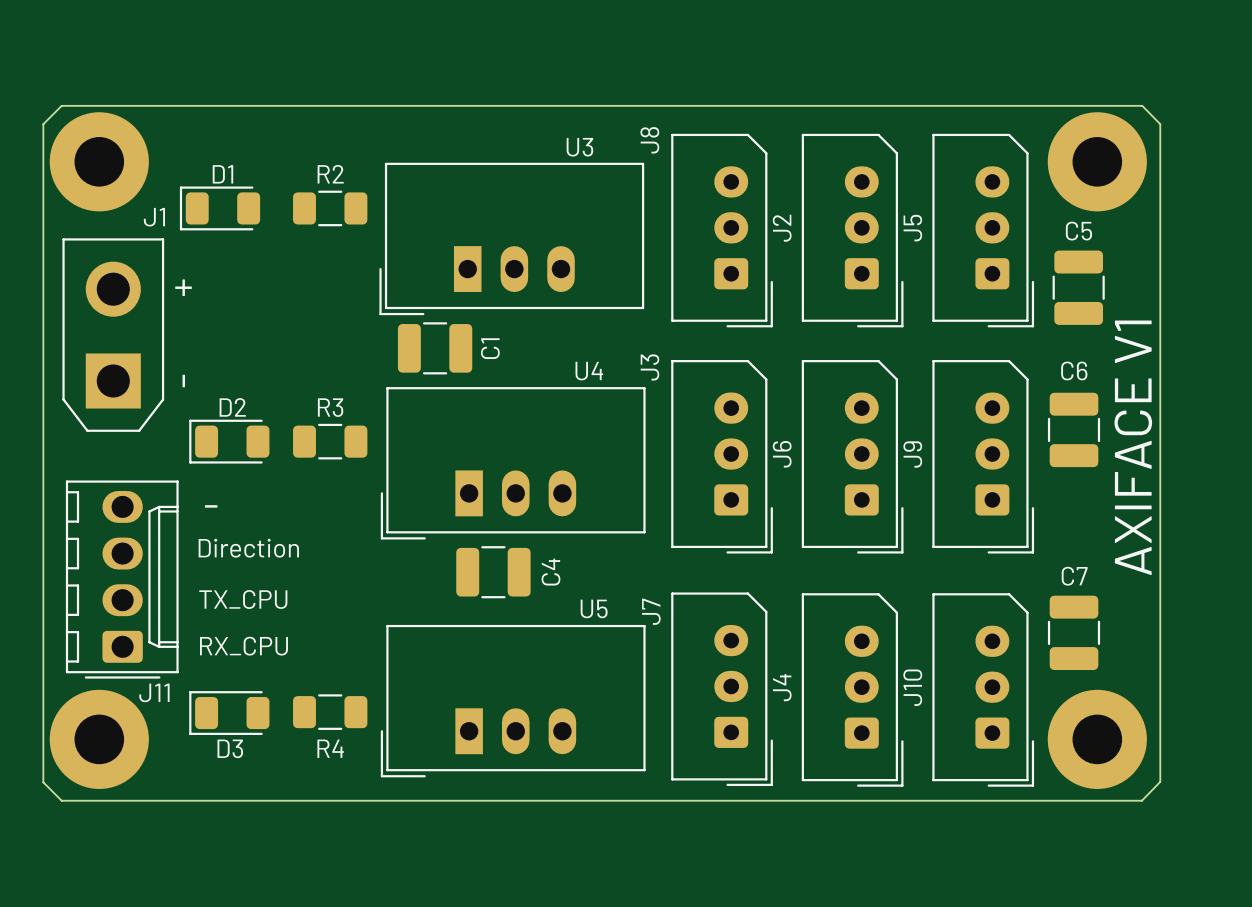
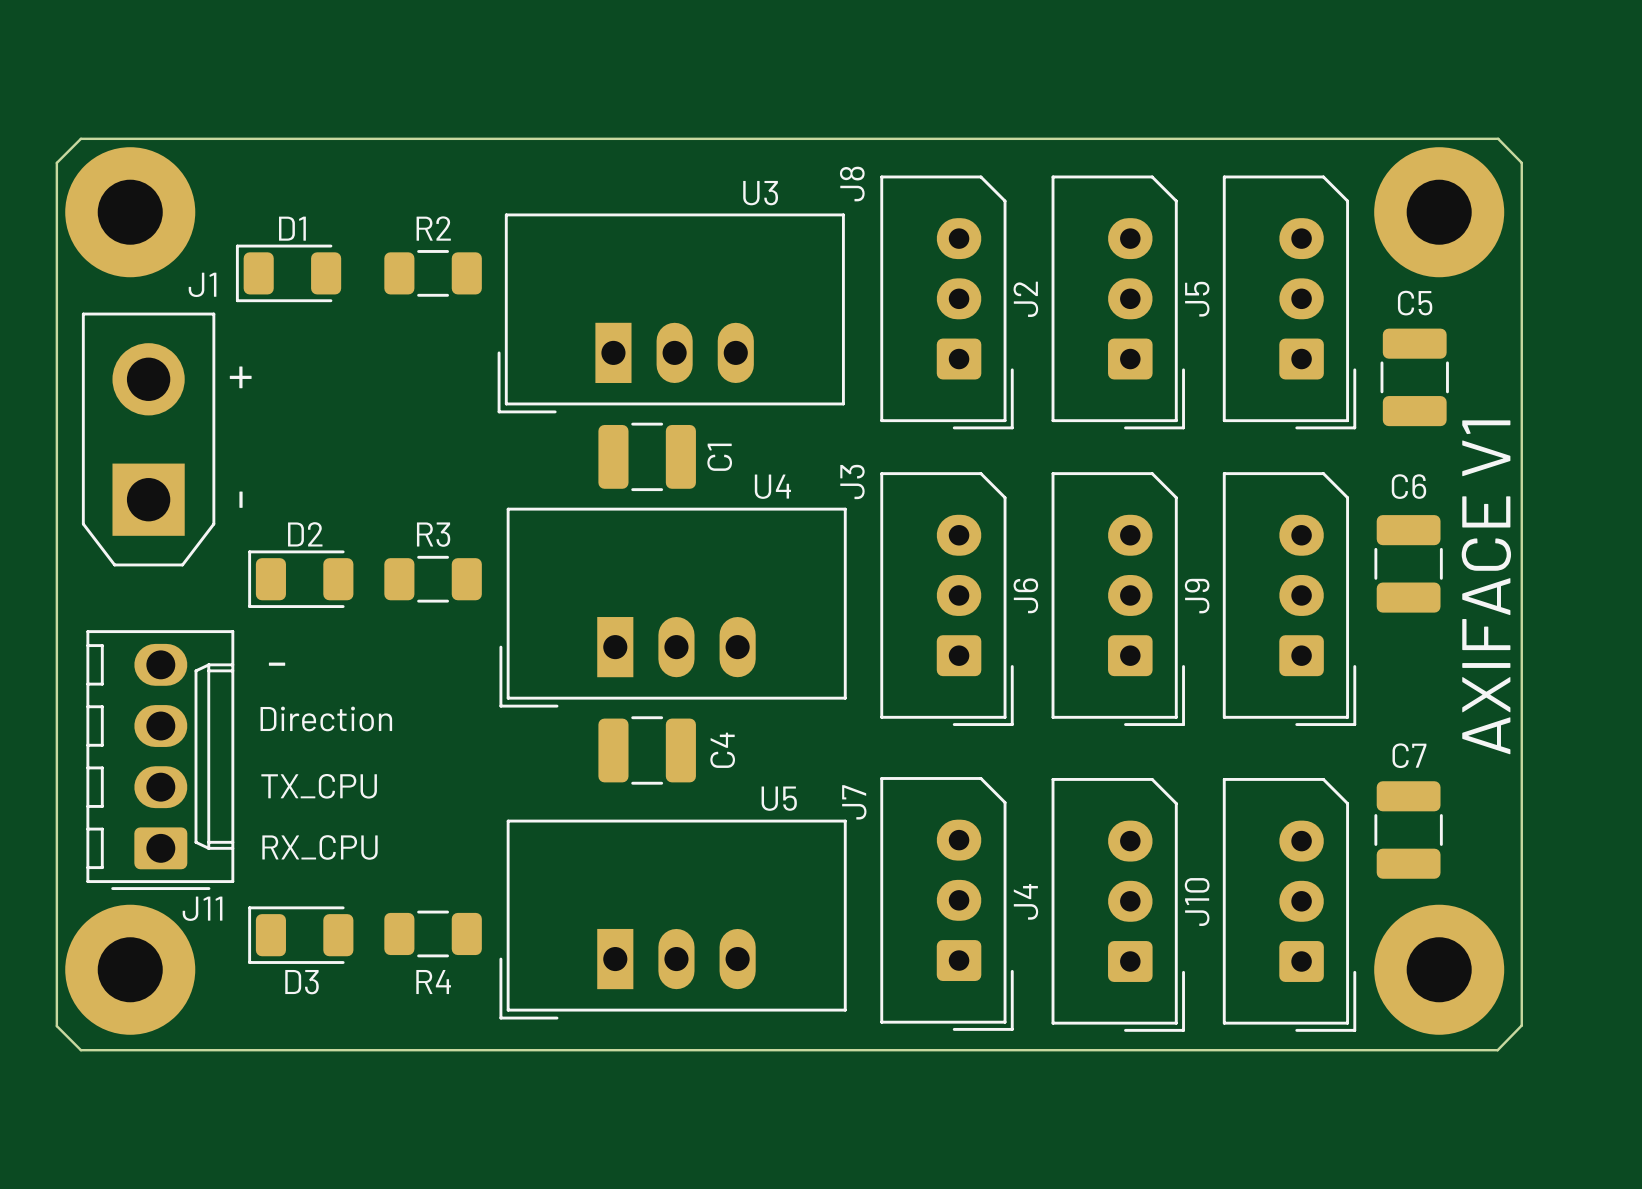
C1 position: (435, 348) -> (647, 456)

